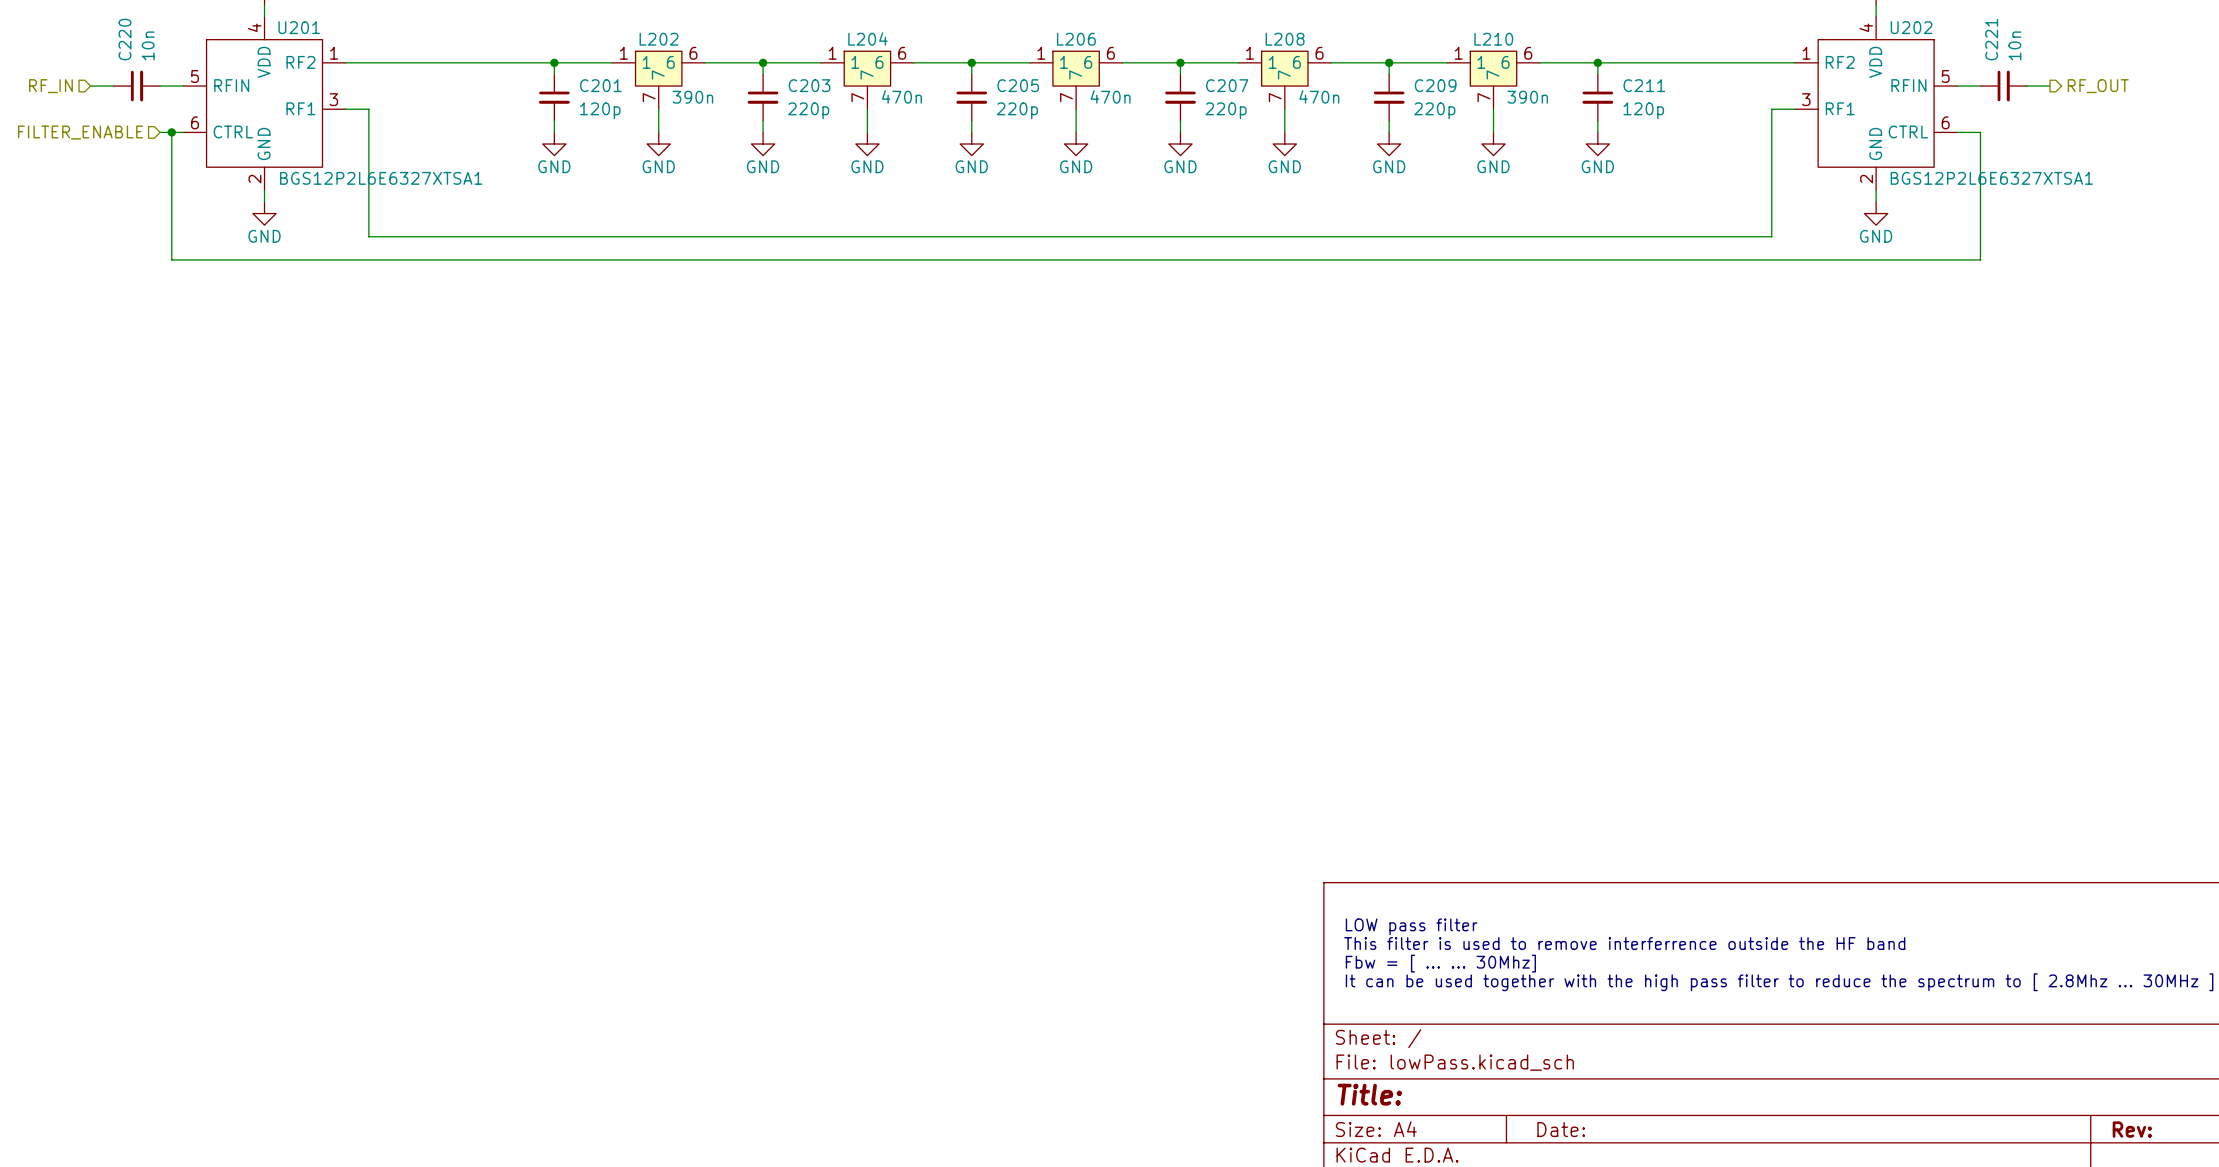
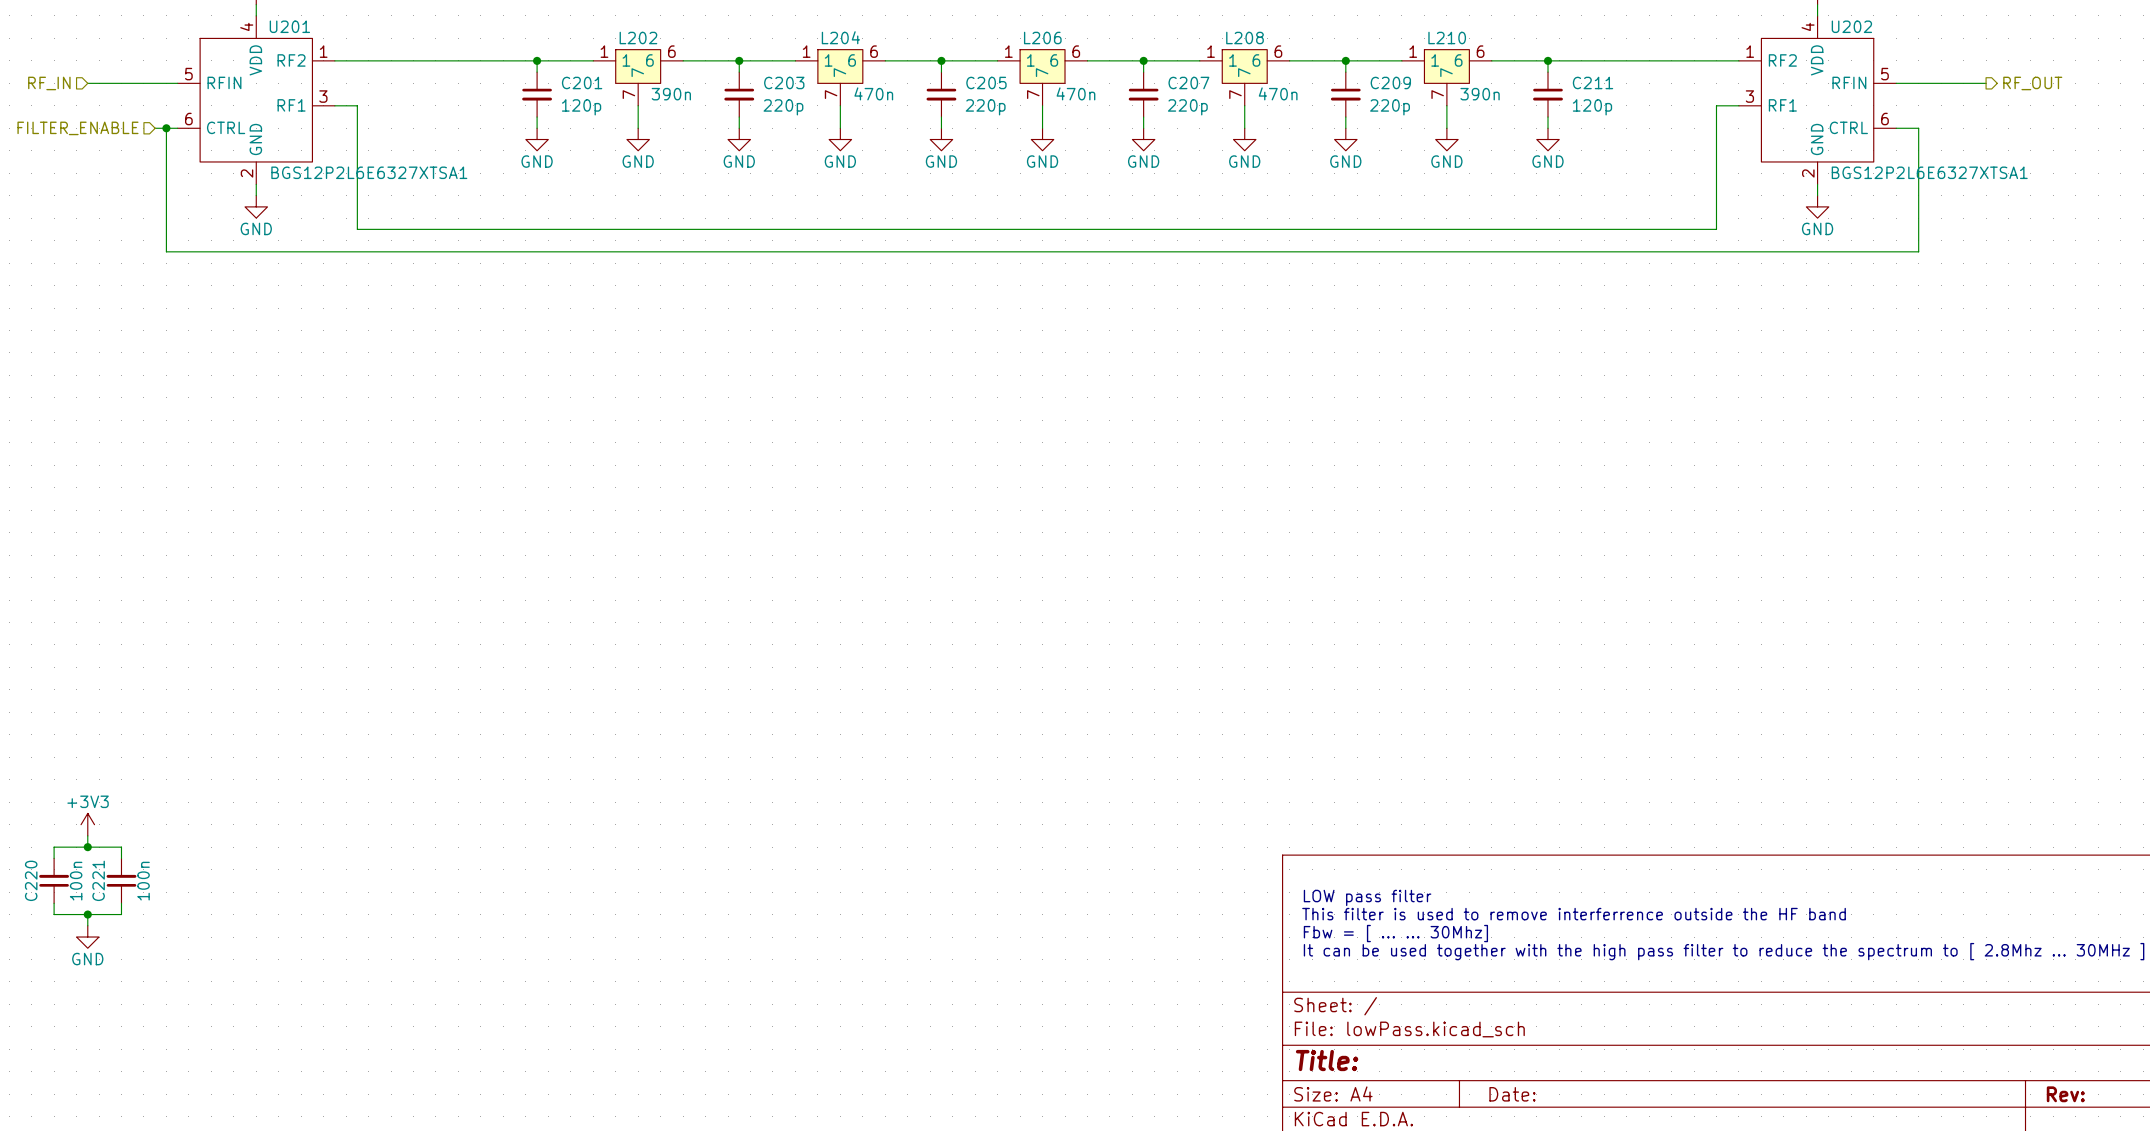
C220 name position: C220 (125, 39) -> C220 (31, 880)
C221 name position: C221 (1991, 39) -> C221 (98, 880)
C220 value: 10n (148, 45) -> 100n (76, 881)
C221 value: 10n (2014, 45) -> 100n (143, 881)
C220 position: (136, 86) -> (54, 880)
C220 rotation: 0° (137, 86) -> 90° counterclockwise (54, 880)
C221 rotation: 0° (2003, 86) -> 90° counterclockwise (121, 880)
C221 position: (2003, 86) -> (121, 880)
power symbol: none -> +3V3 (87, 824)
wire: none -> (87, 835) (87, 847)
junction: none -> (87, 847)
wire: none -> (54, 858) (54, 847) (121, 847) (121, 858)
wire: none -> (54, 903) (54, 914) (121, 914) (121, 903)
wire: none -> (87, 914) (87, 925)
junction: none -> (87, 914)
power symbol: none -> GND (87, 937)

